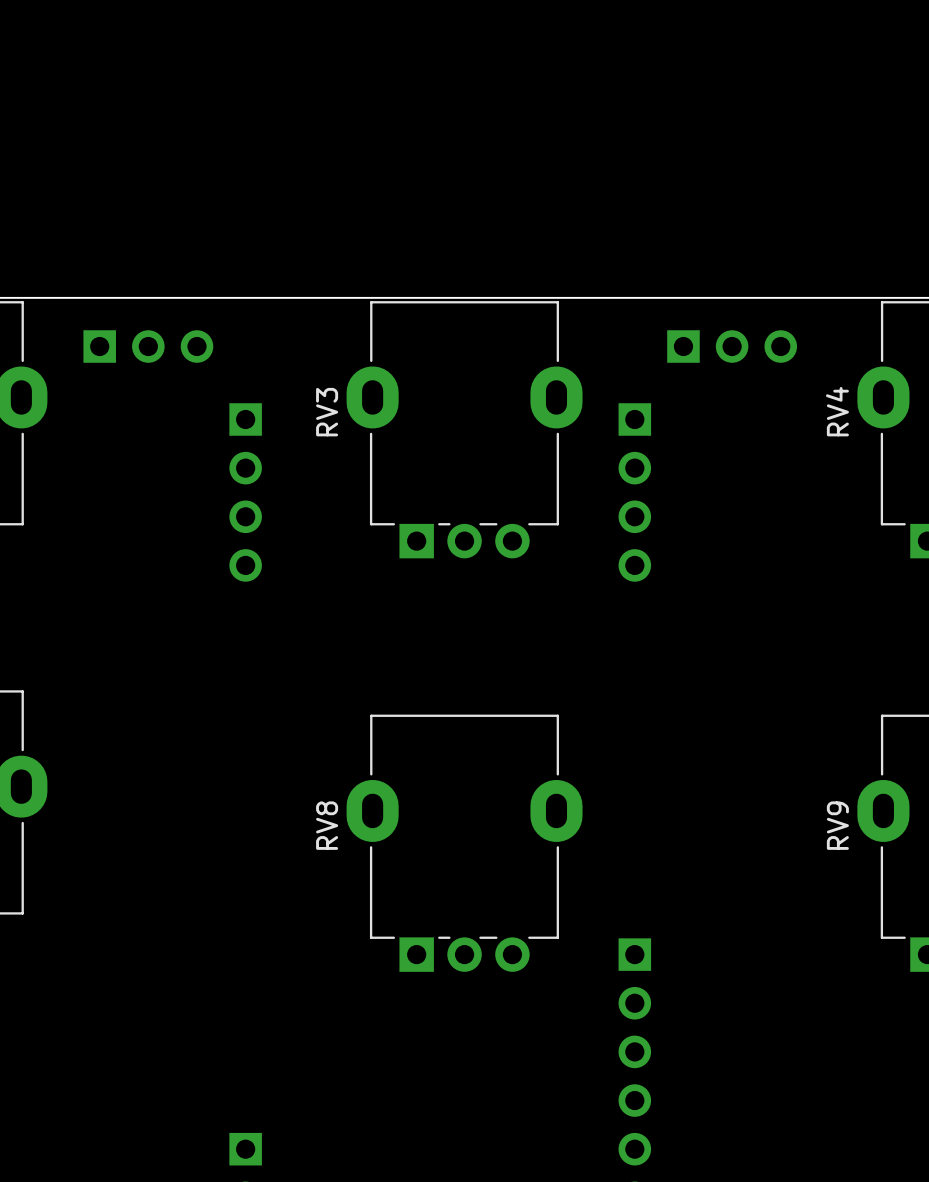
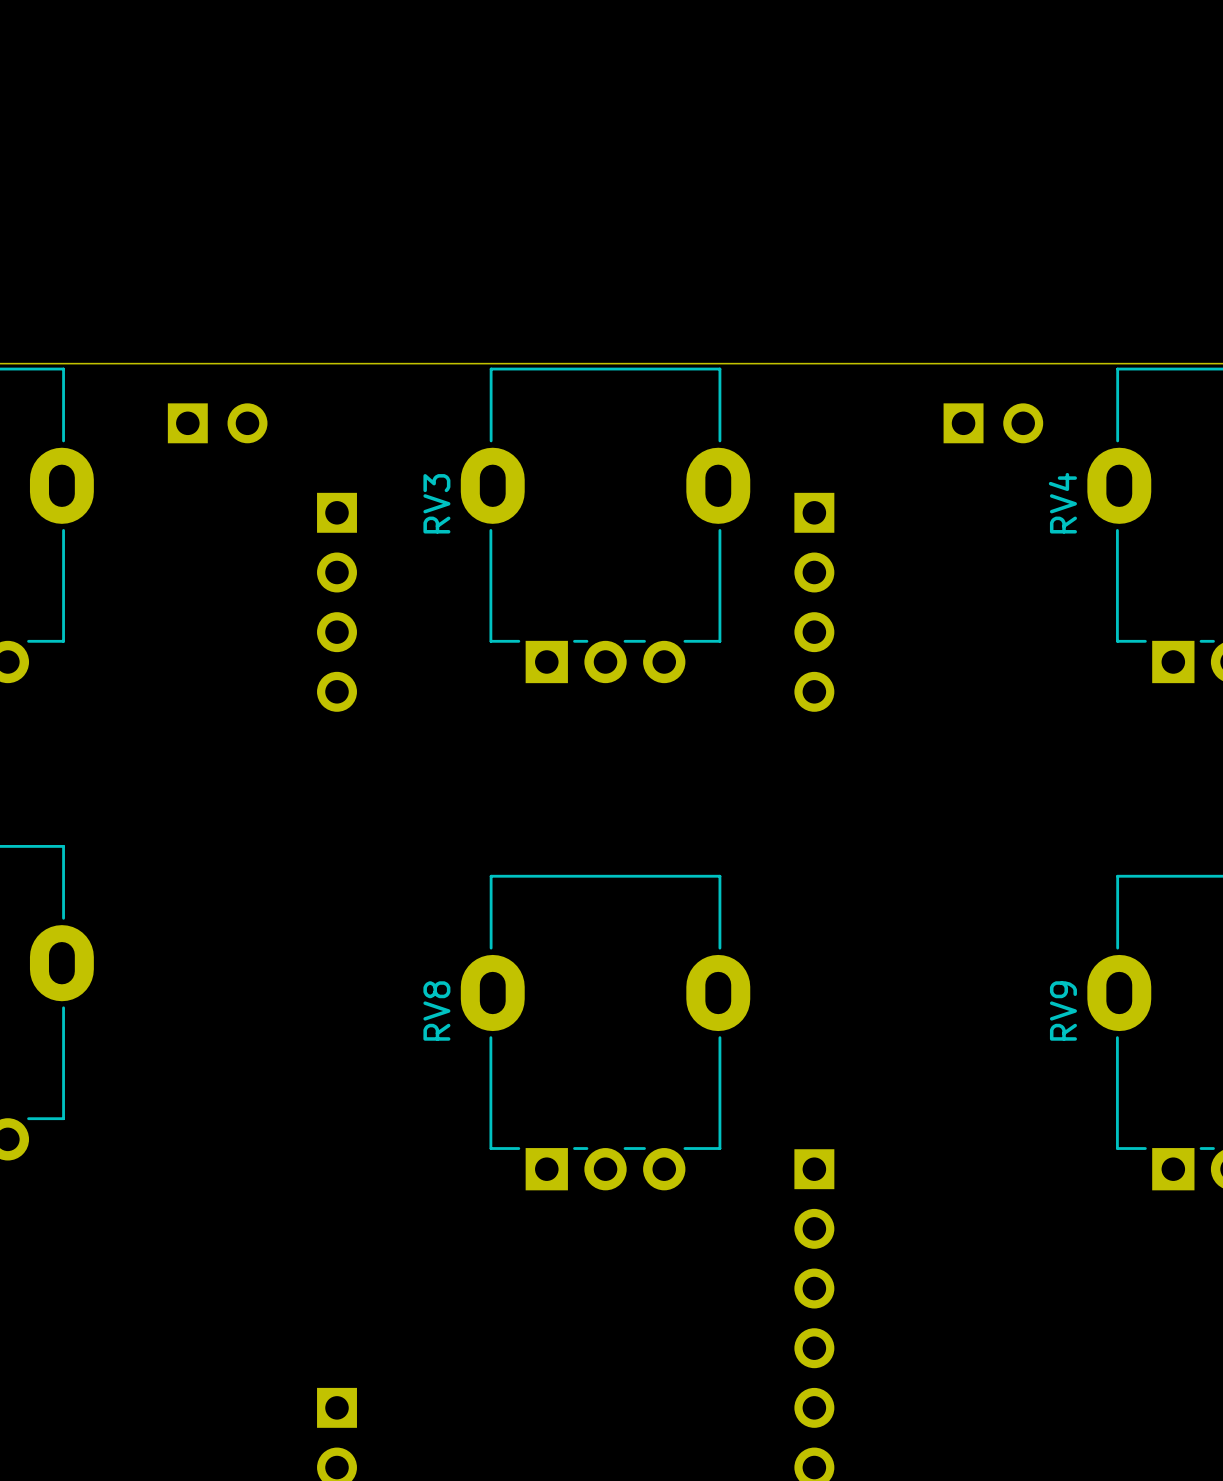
part footprint: [83, 330, 214, 363] -> [167, 403, 268, 444]
part: (732, 346) -> none
part: none -> (993, 423)

